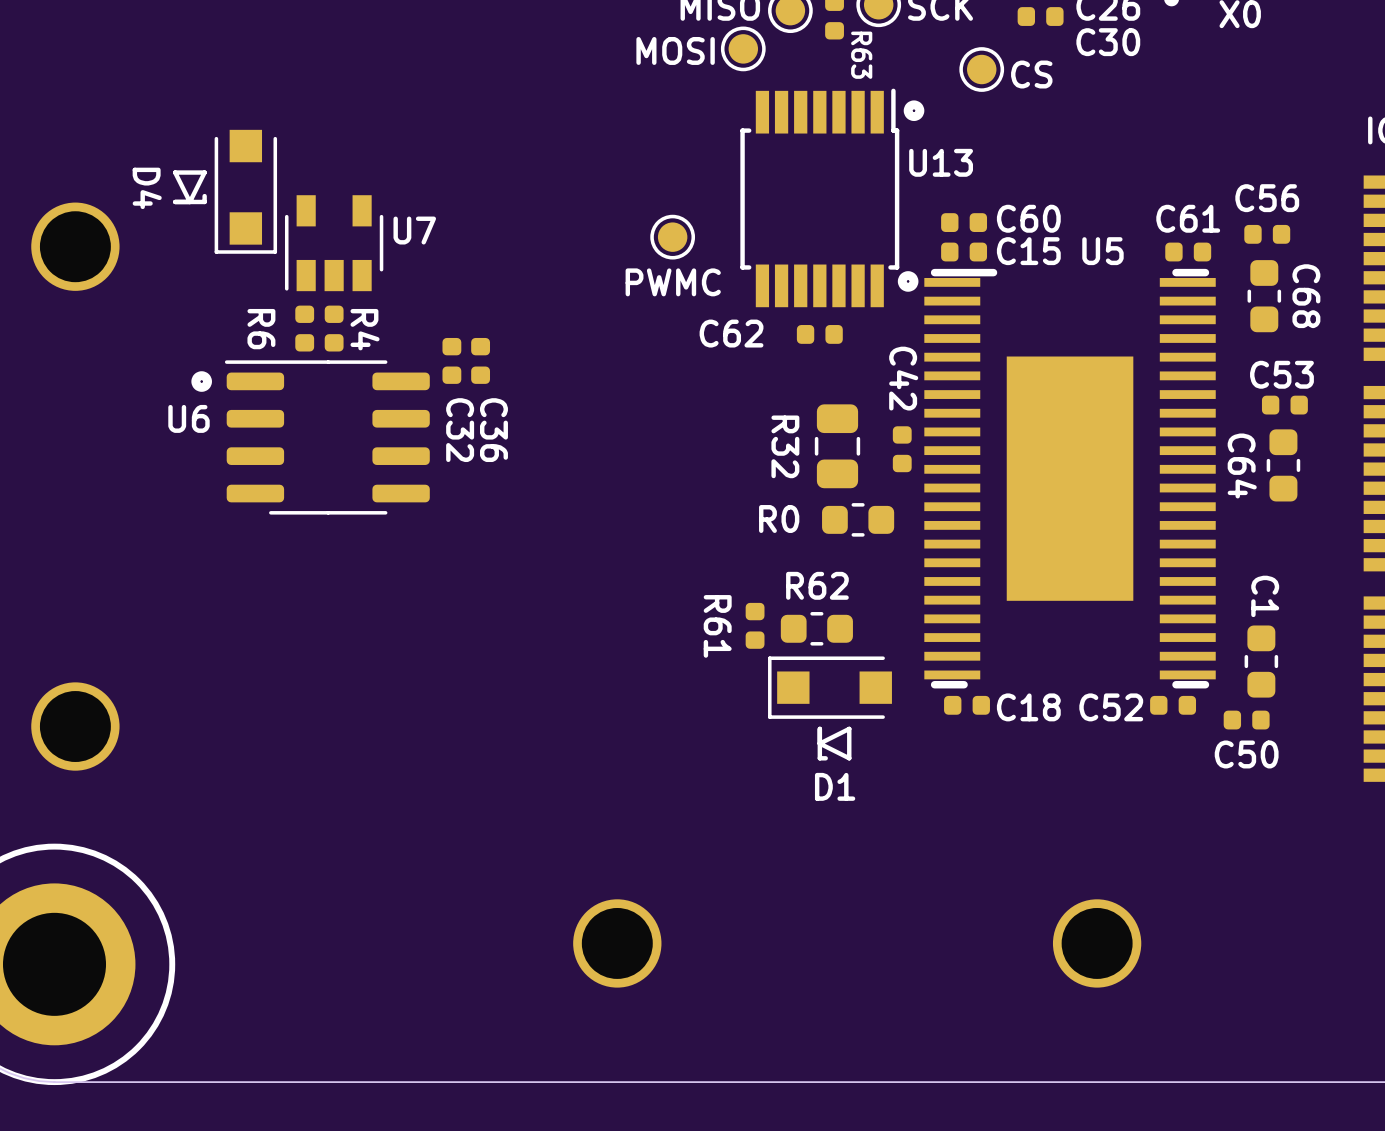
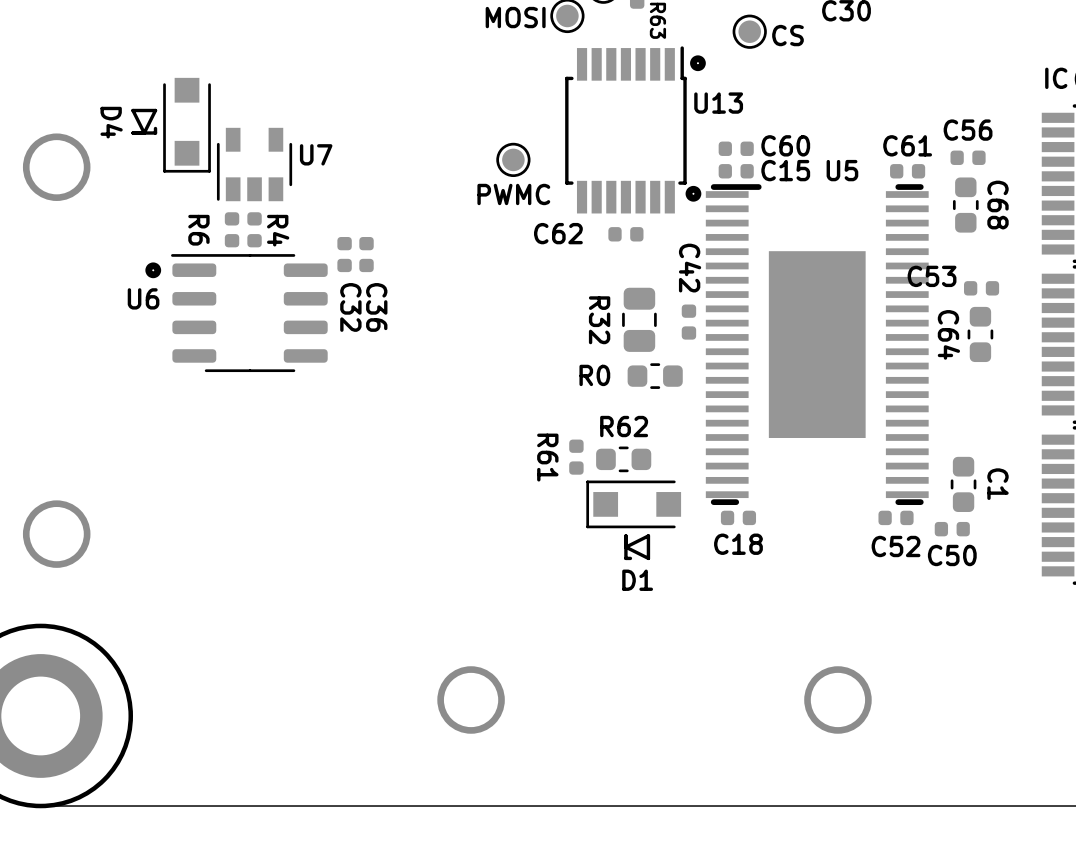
C53 name position: C53 (1281, 374) -> C53 (932, 276)
C1 name position: C1 (1265, 596) -> C1 (997, 484)
C18 name position: C18 (1028, 707) -> C18 (738, 544)
C52 name position: C52 (1111, 707) -> C52 (896, 546)

